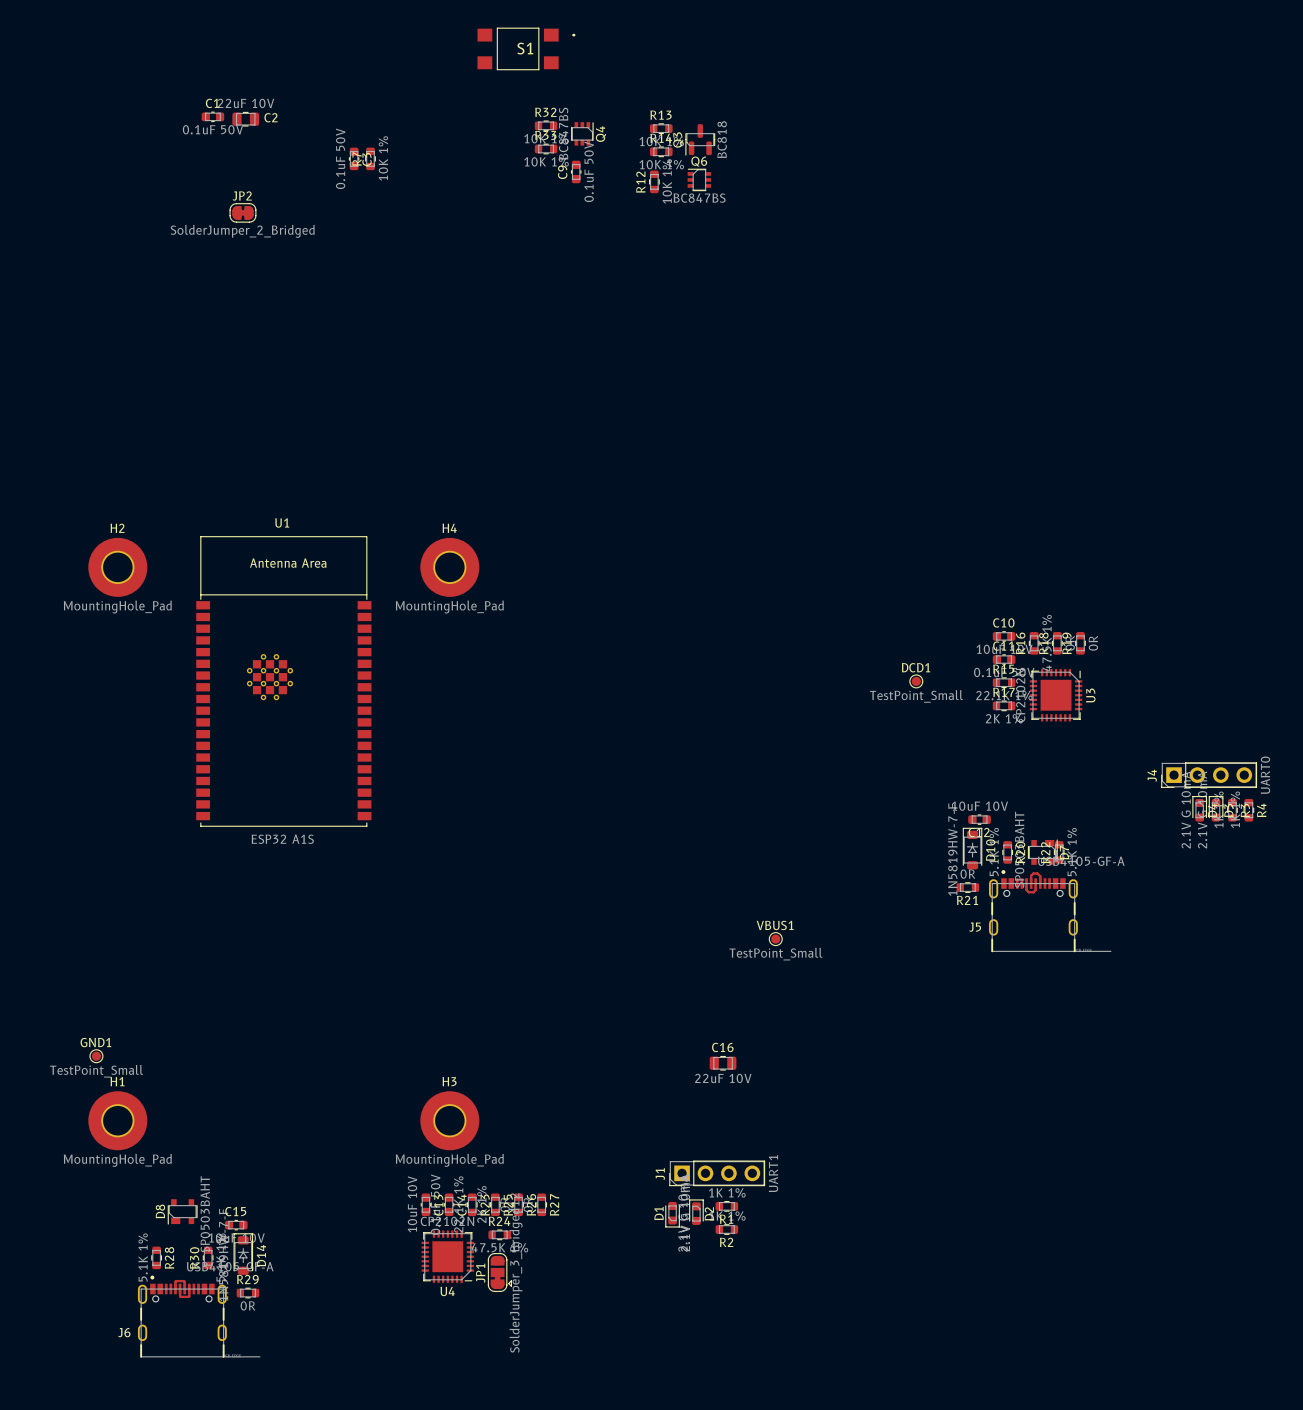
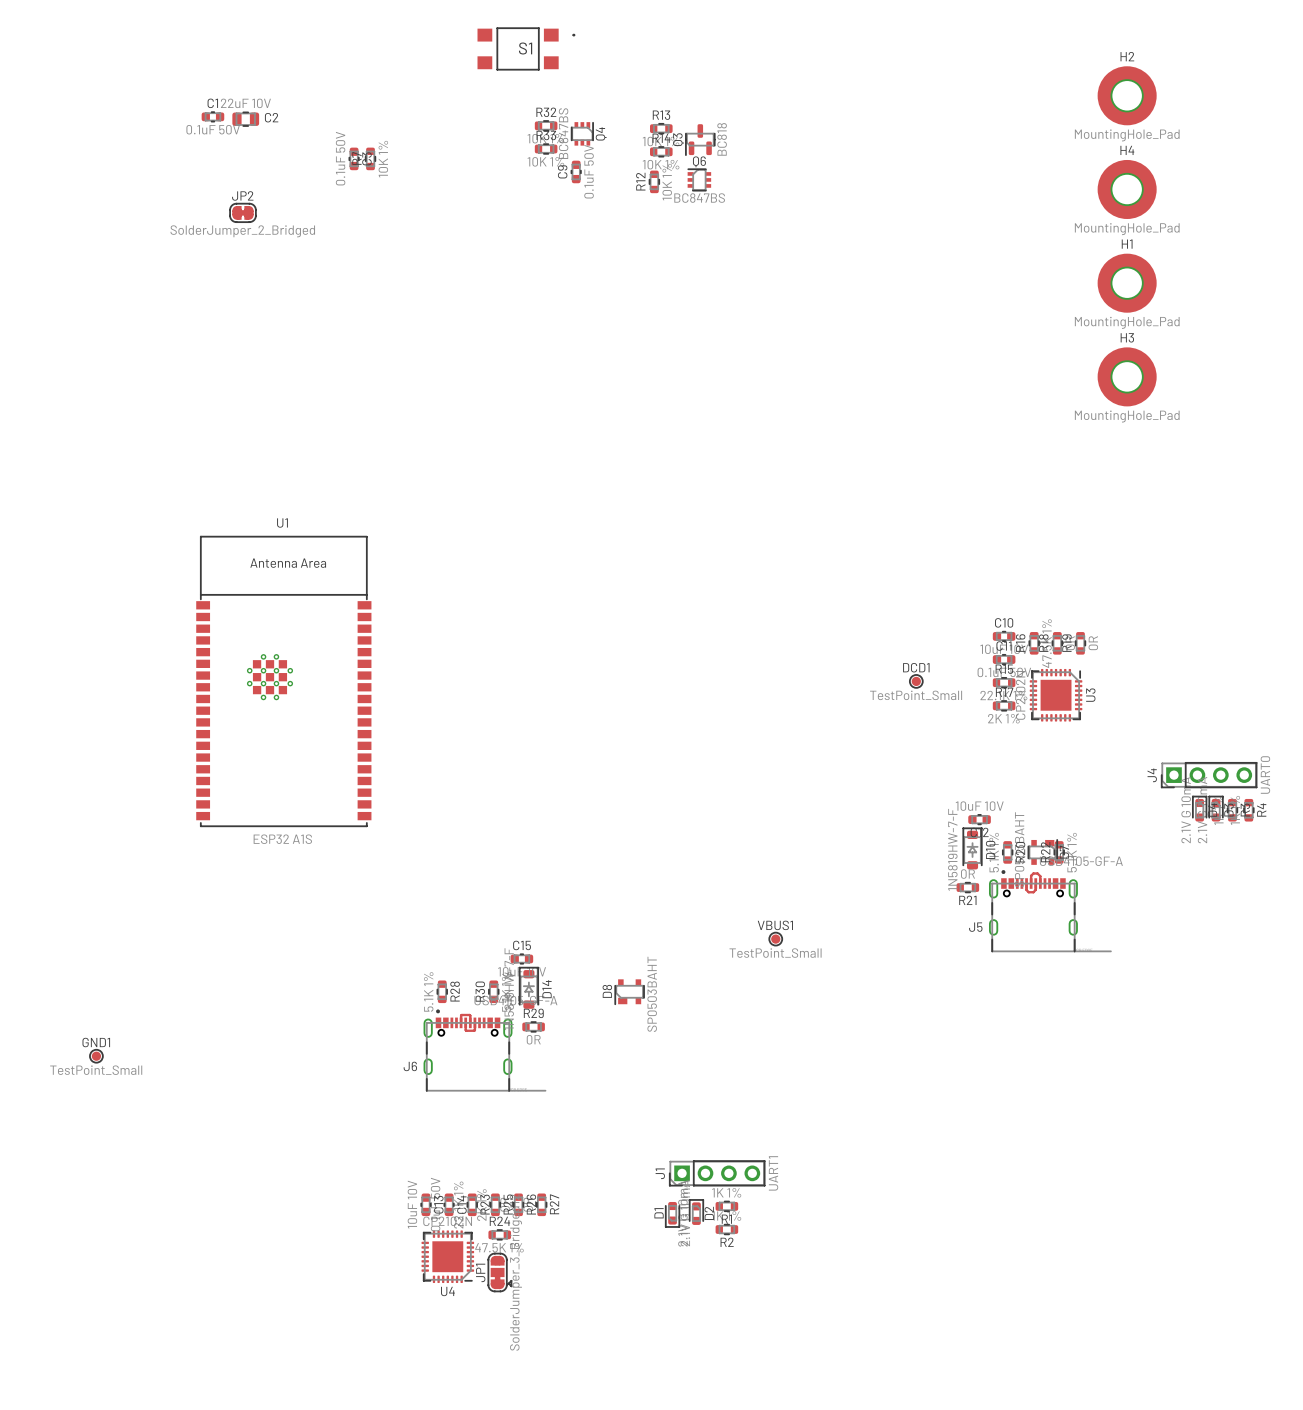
H2 position: (117, 567) -> (1127, 95)
H4 position: (449, 567) -> (1127, 189)
track: none -> (461, 1022) (461, 1015) (469, 1015) (470, 1022)
track: none -> (465, 1022) (466, 1030) (474, 1030) (474, 1022)
C16: 22uF 10V (723, 1063) -> none
H1 position: (117, 1120) -> (1127, 283)
H3 position: (449, 1120) -> (1127, 376)
D8 position: (182, 1211) -> (629, 992)
C15 position: (236, 1225) -> (521, 958)
D14 position: (243, 1254) -> (528, 987)
R28 position: (156, 1257) -> (442, 991)
R30 position: (208, 1257) -> (493, 991)
track: (175, 1289) (176, 1281) (184, 1281) (184, 1289) -> none
track: (180, 1289) (180, 1296) (188, 1296) (189, 1289) -> none
R29 position: (247, 1293) -> (533, 1026)
J6 position: (199, 1316) -> (484, 1050)

